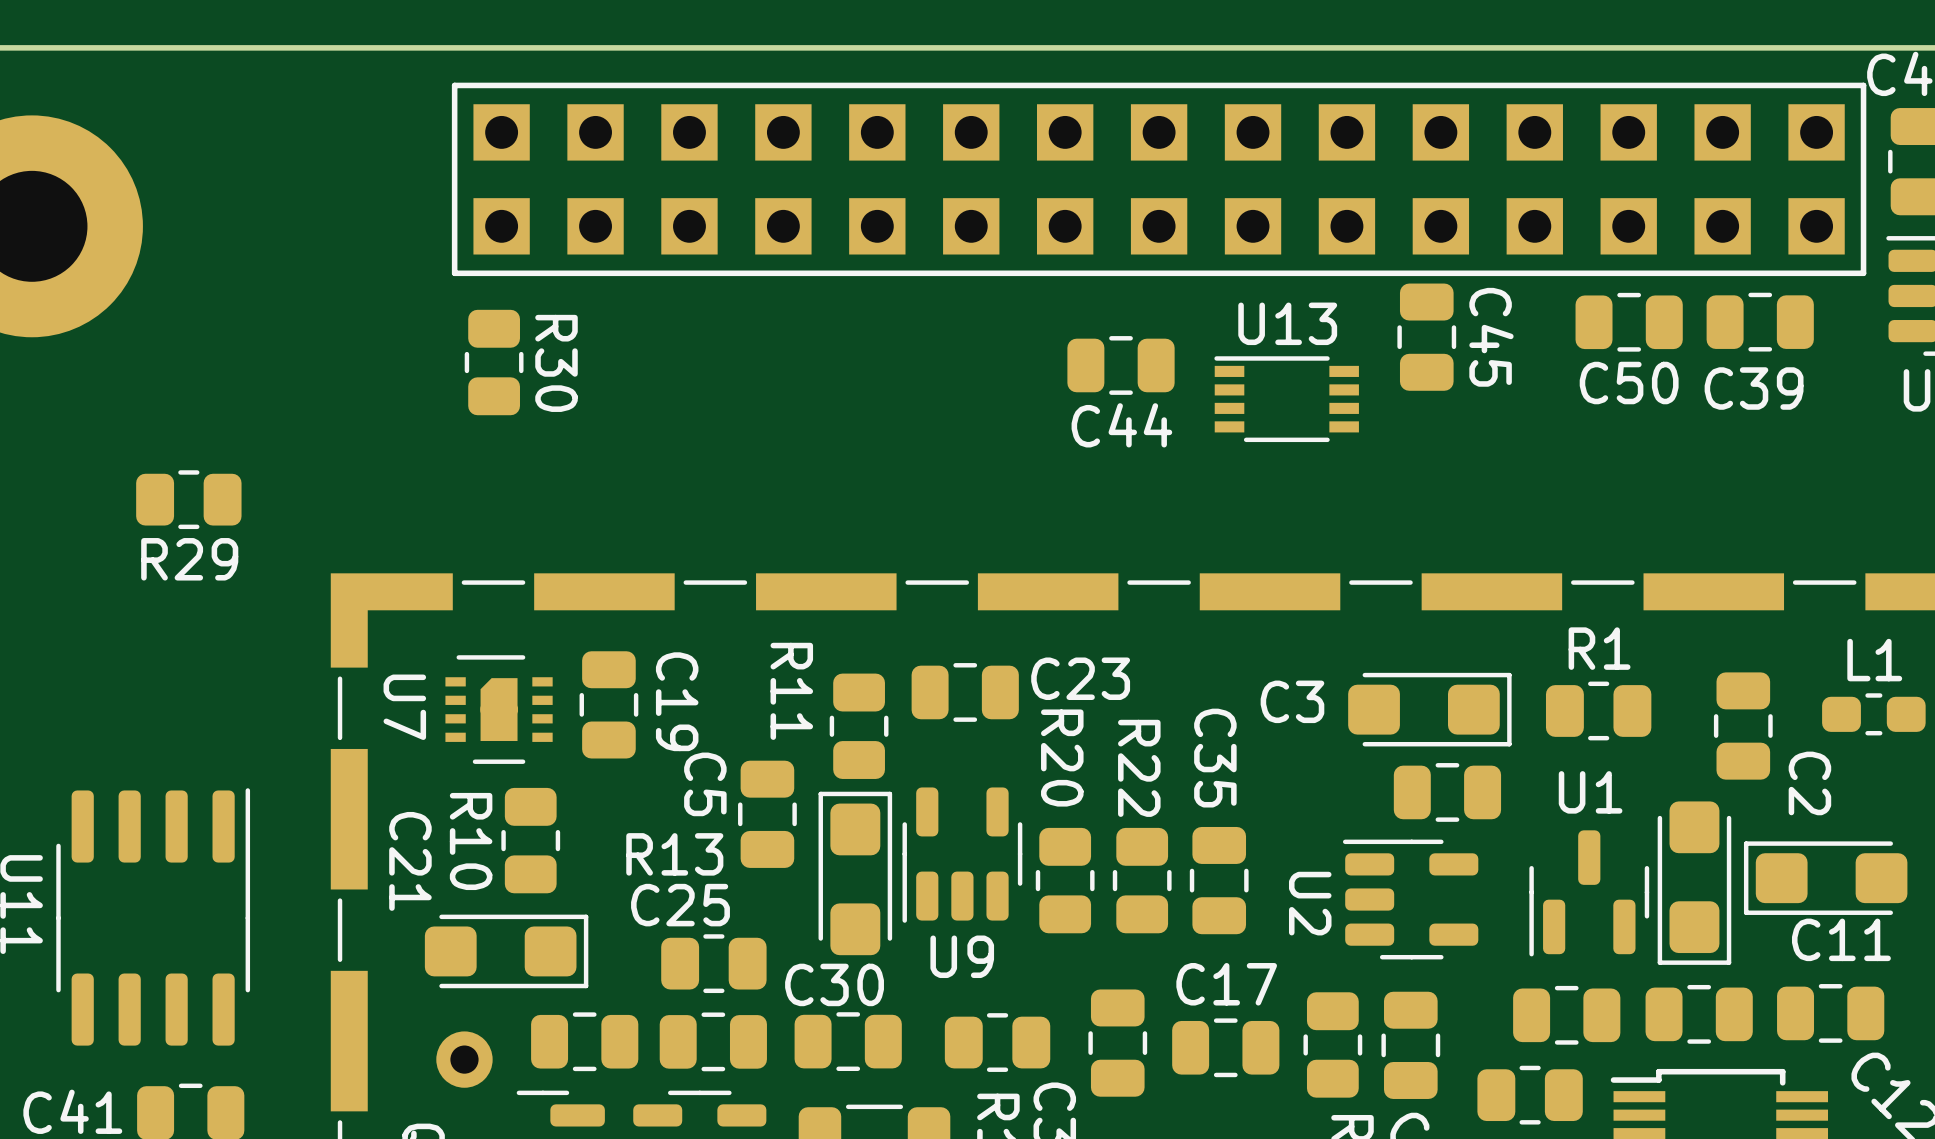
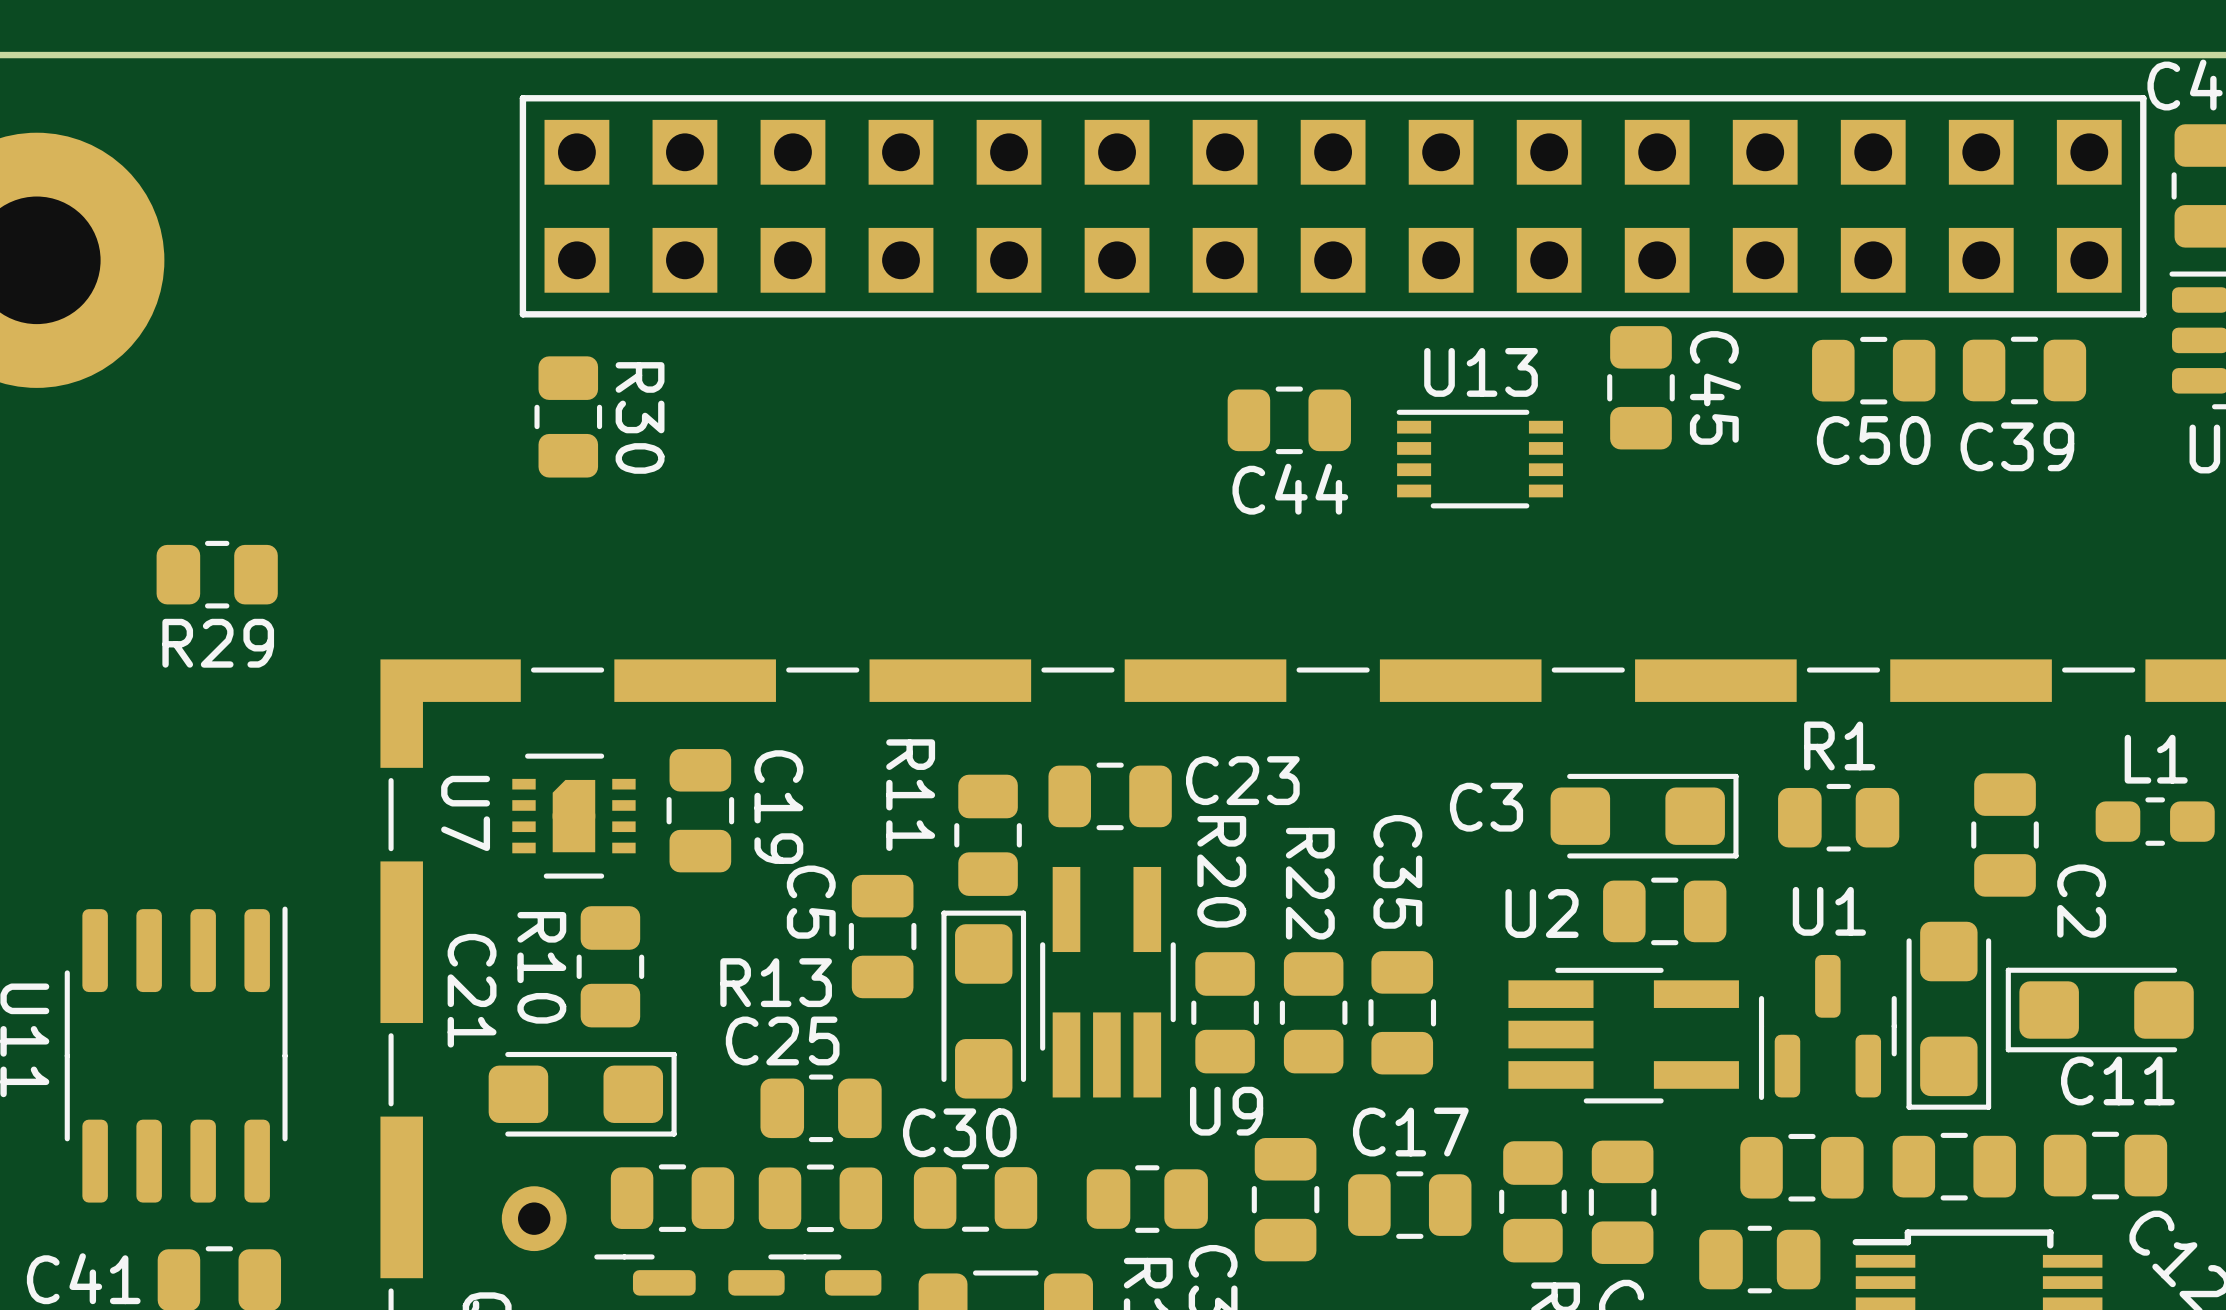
U9 footprint: [902, 787, 1023, 923] -> [1040, 866, 1176, 1098]
U2 footprint: [1342, 839, 1479, 960] -> [1508, 967, 1739, 1104]
U2 name position: U2 (1310, 903) -> U2 (1542, 913)
U9 name position: U9 (962, 956) -> U9 (1226, 1111)

